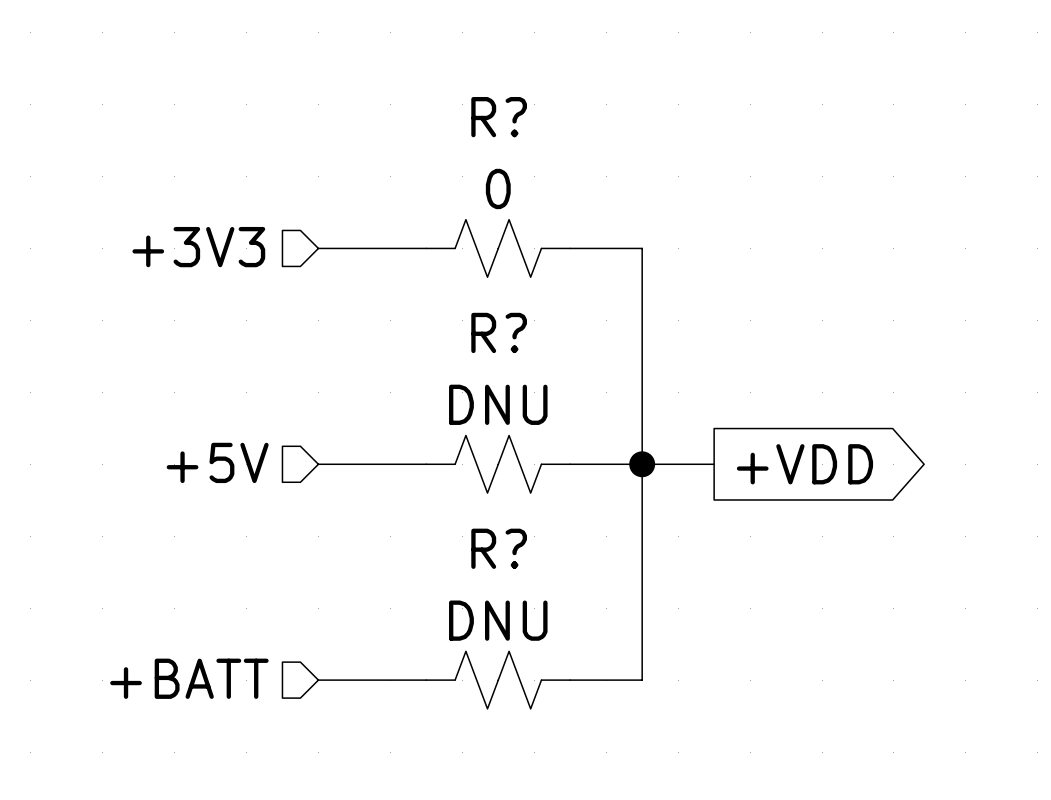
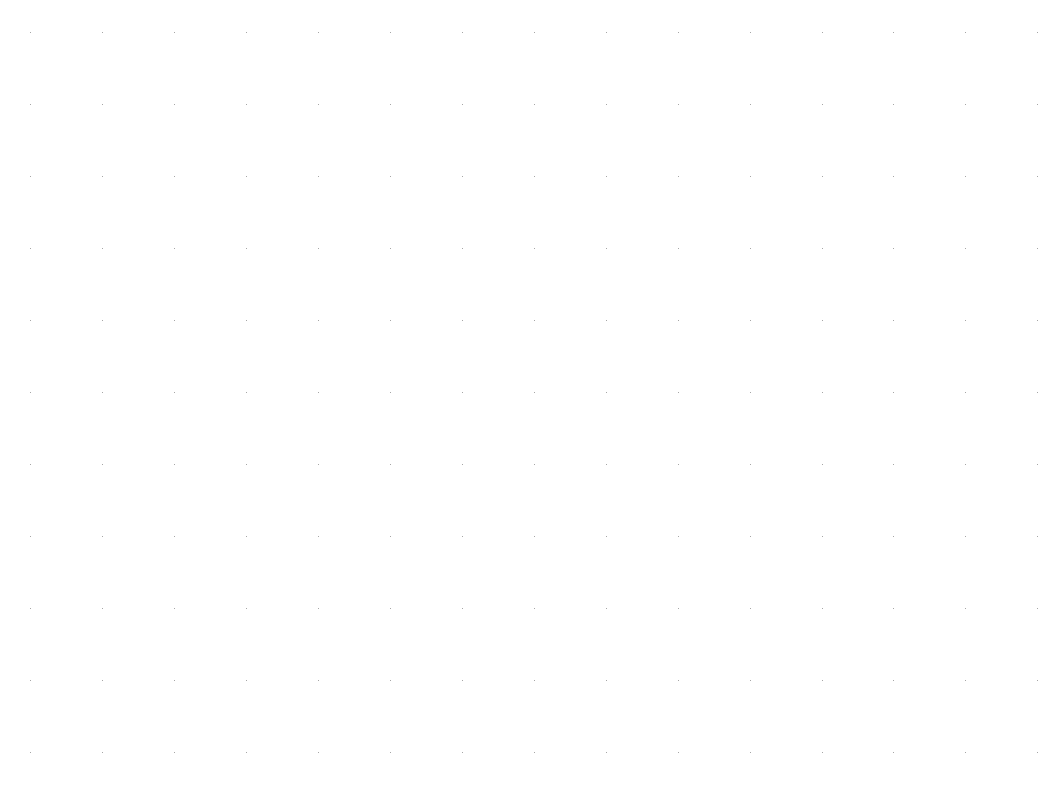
hierarchical label: +3V3 (198, 247) -> none
wire: (318, 248) (426, 248) -> none
R?: 0 (498, 248) -> none
wire: (570, 248) (642, 248) (642, 680) (570, 680) -> none
hierarchical label: +5V (217, 462) -> none
wire: (318, 464) (426, 464) -> none
R?: DNU (498, 464) -> none
wire: (570, 464) (714, 464) -> none
junction: (642, 464) -> none
global label: +VDD (804, 464) -> none
hierarchical label: +BATT (189, 678) -> none
wire: (318, 680) (426, 680) -> none
R?: DNU (498, 680) -> none

